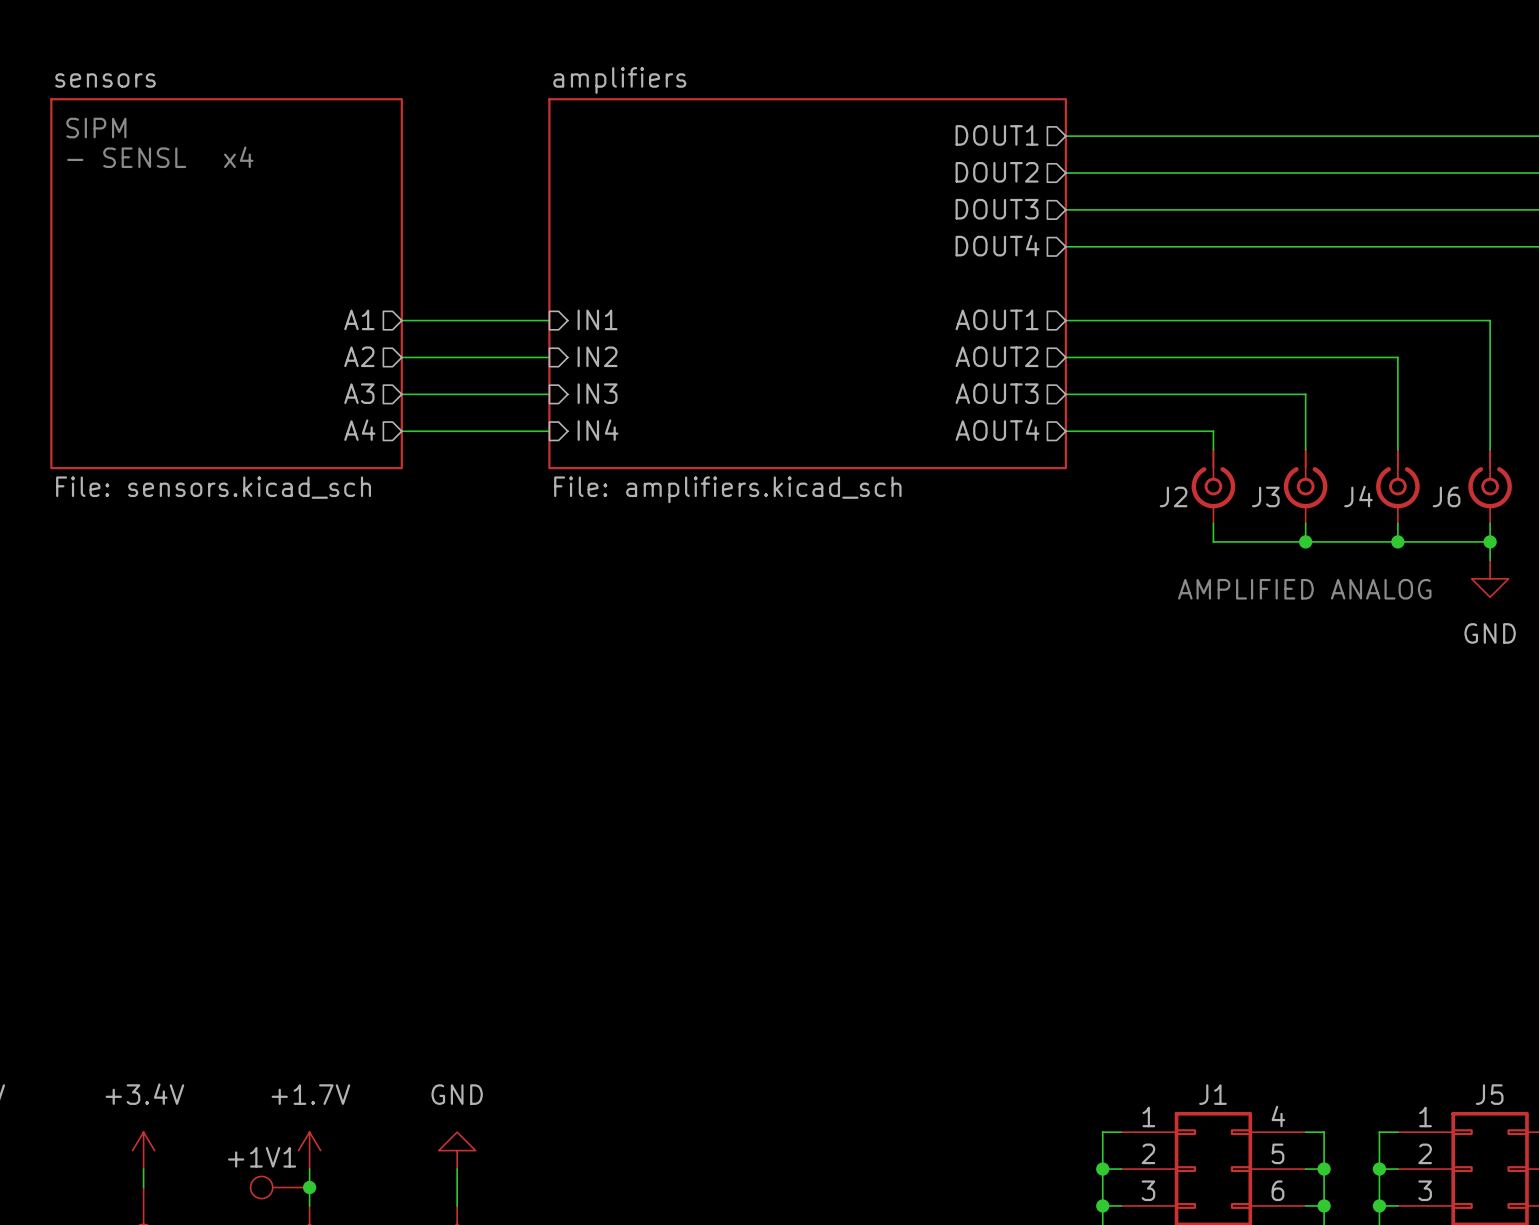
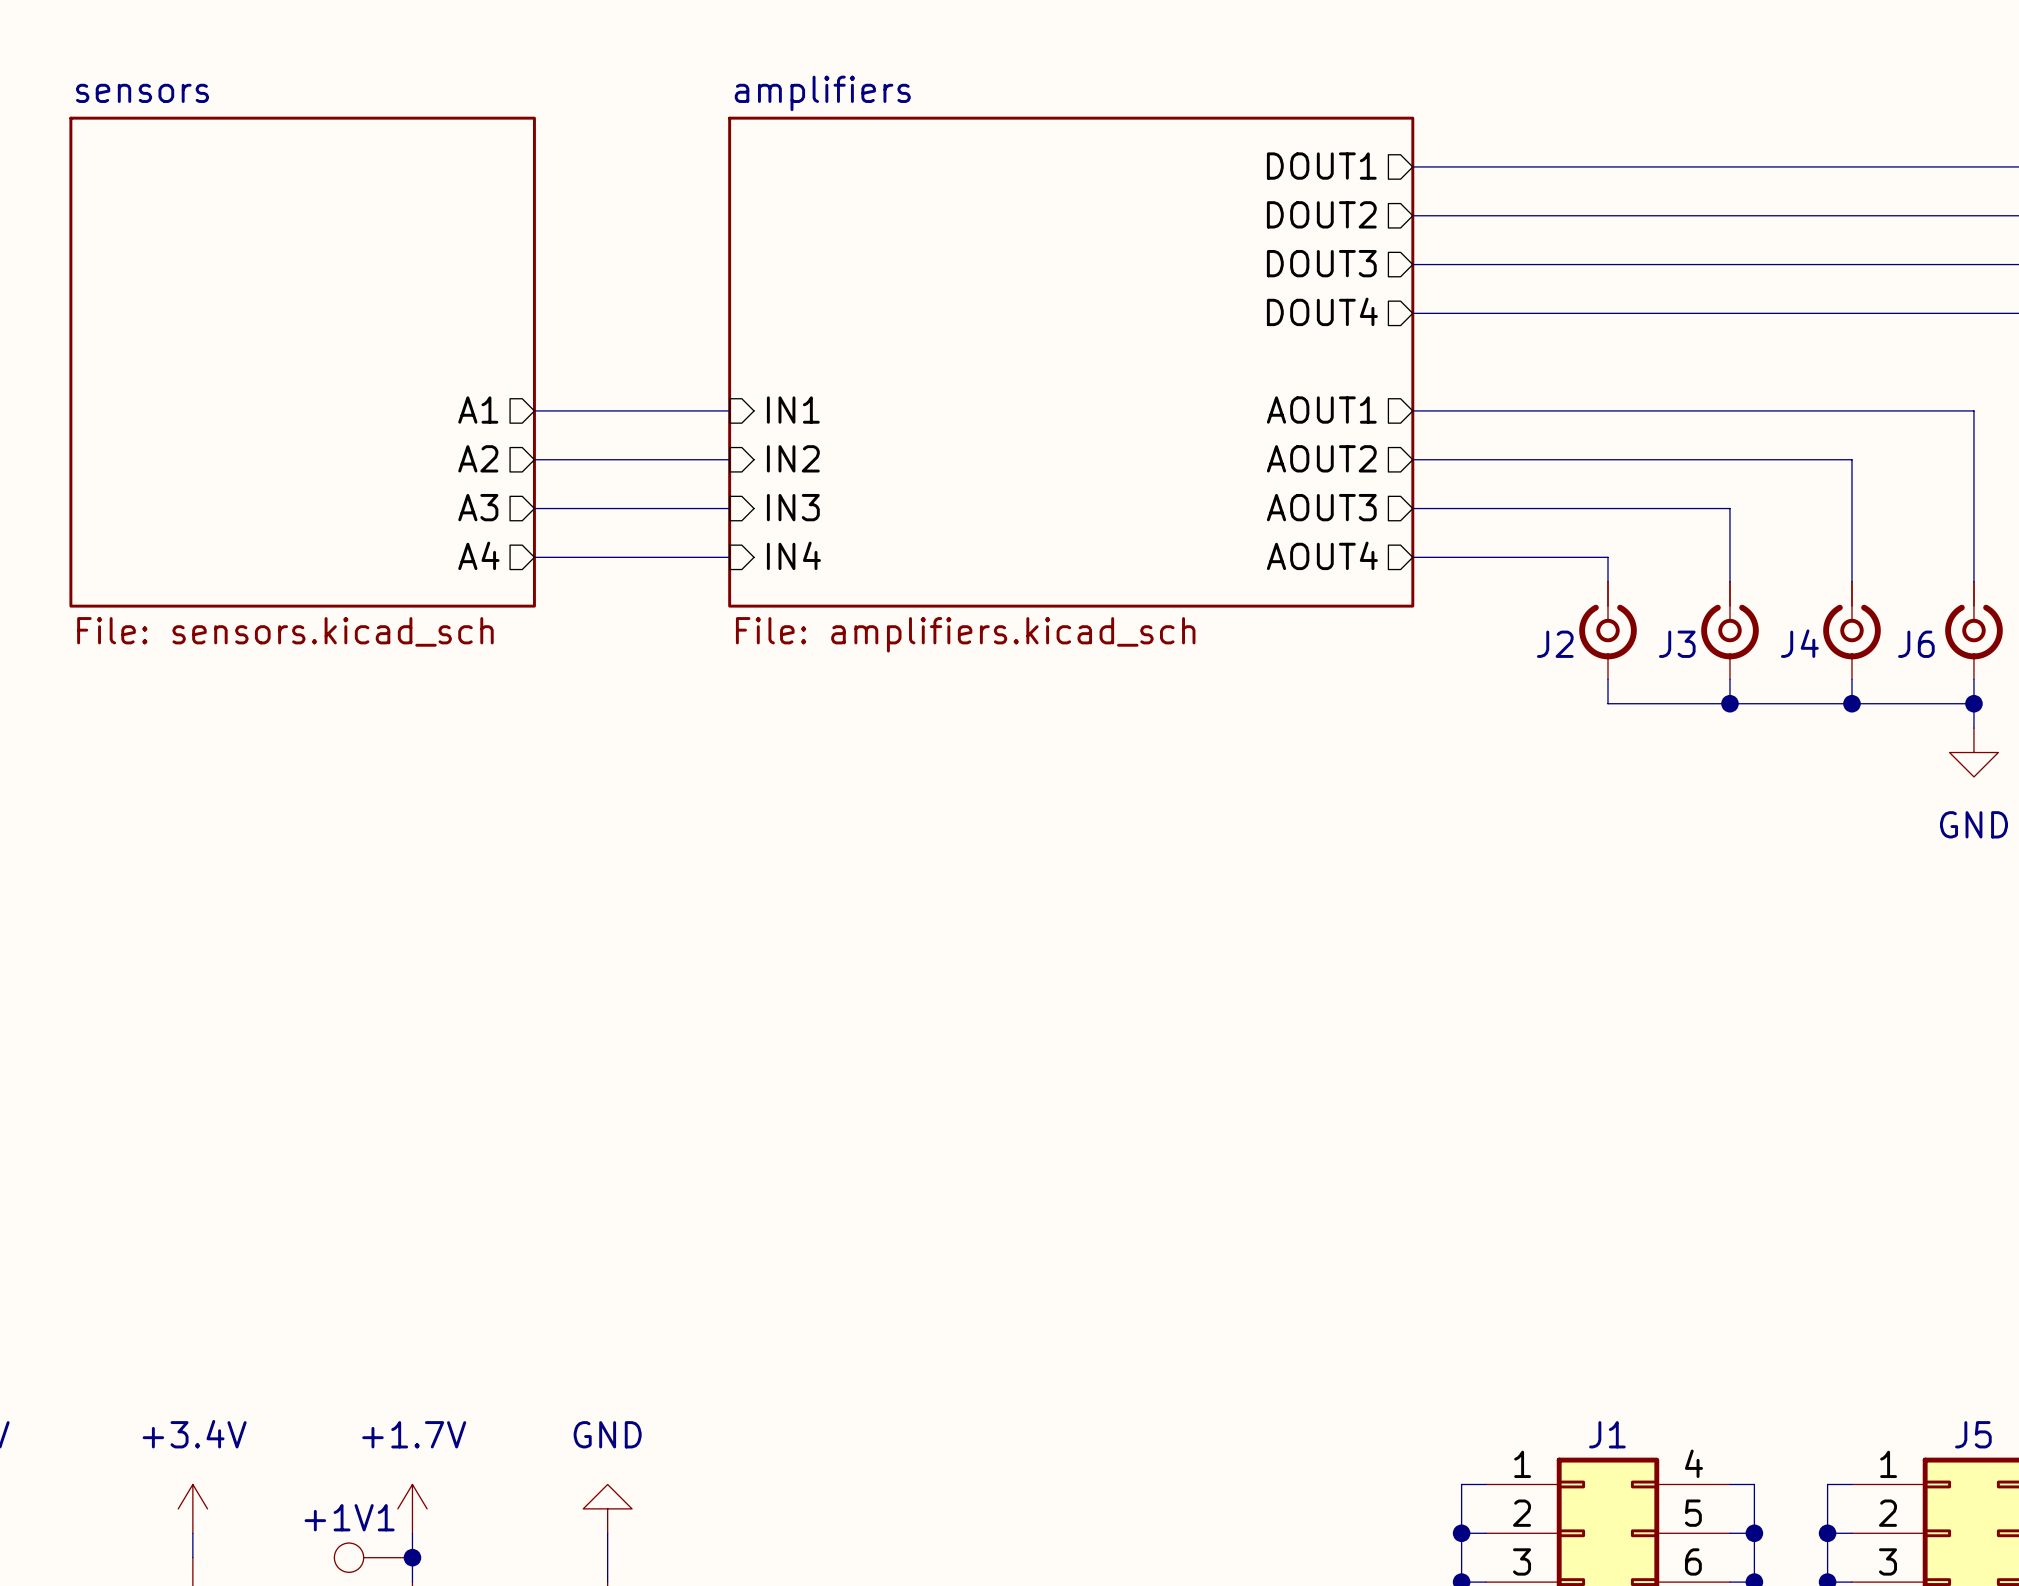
text: SIPM (96, 128) -> none
text: - SENSL (126, 157) -> none
text: x4 (238, 157) -> none
text: AMPLIFIED ANALOG (1304, 589) -> none

